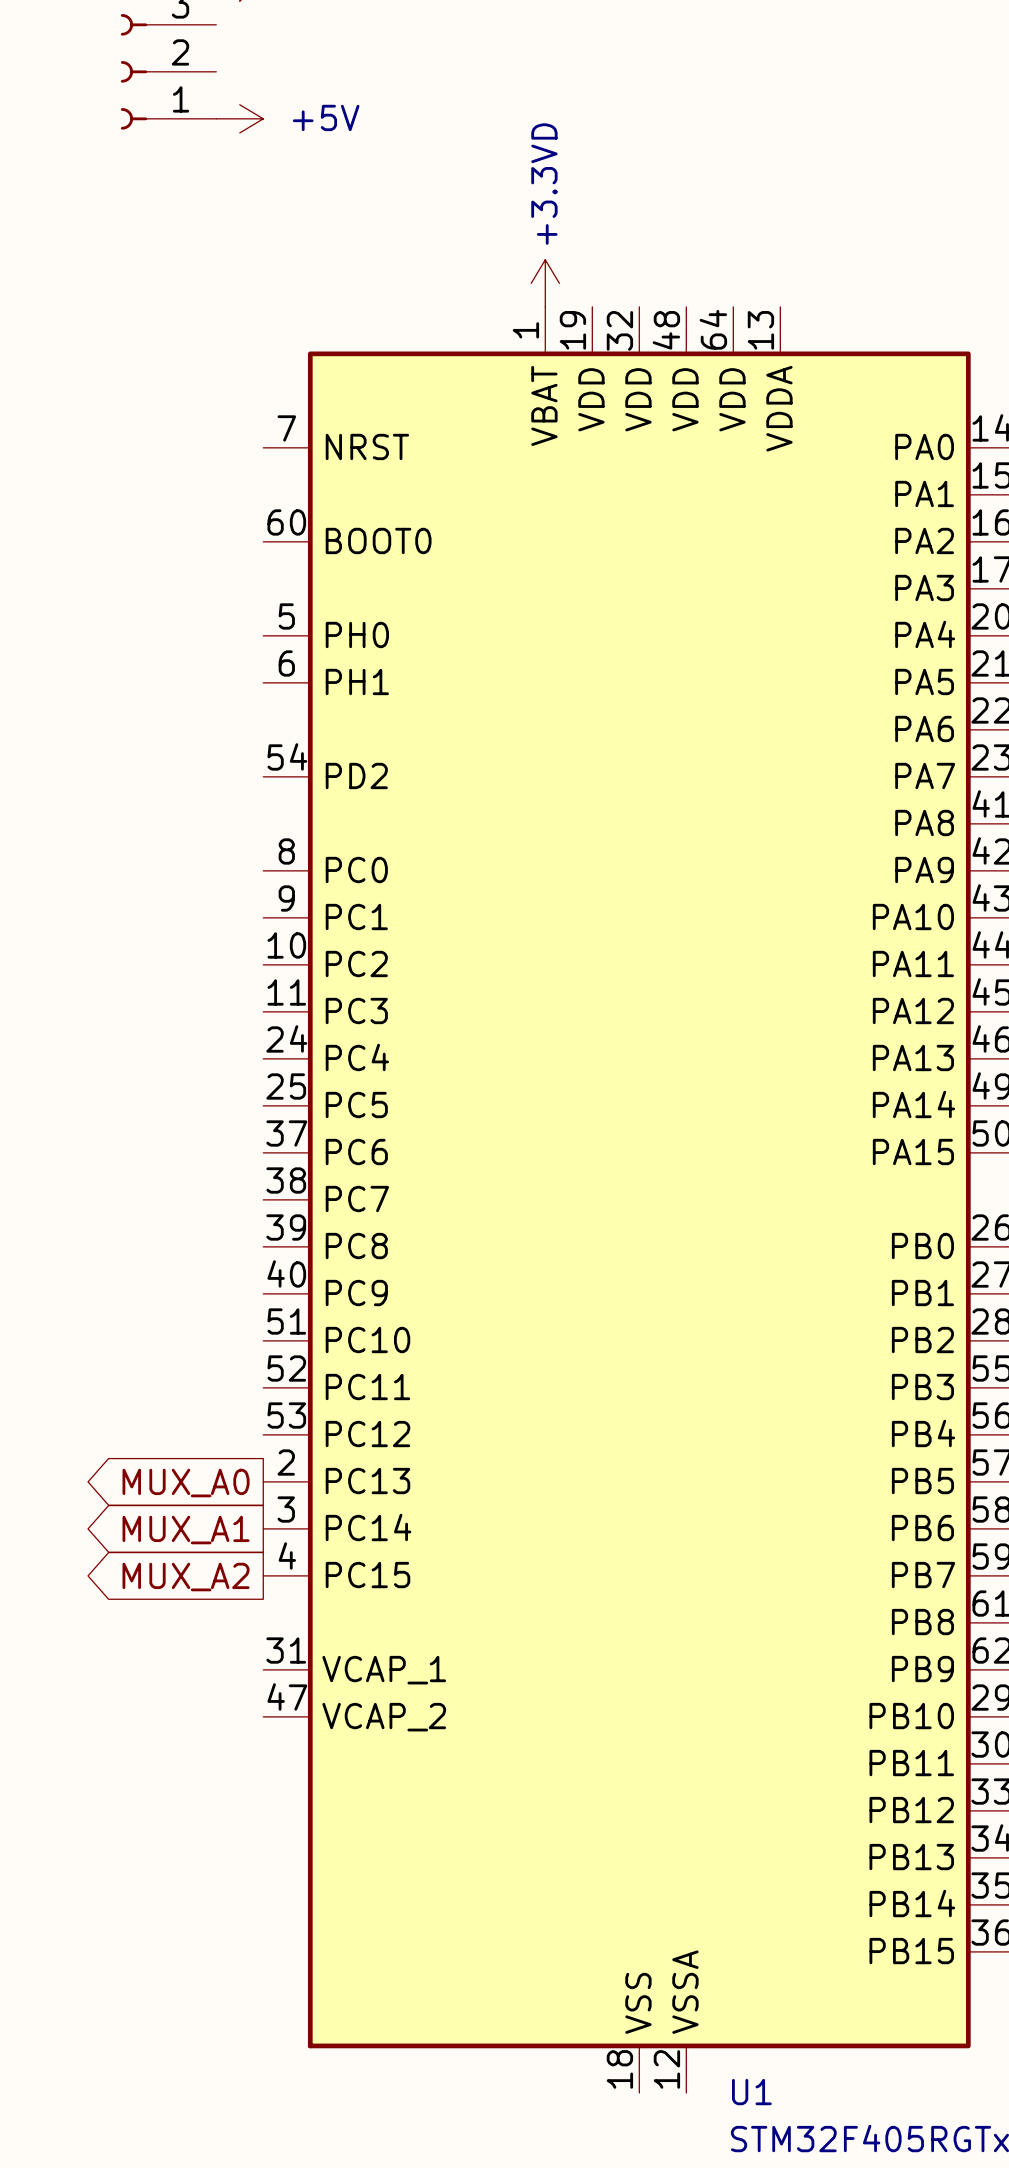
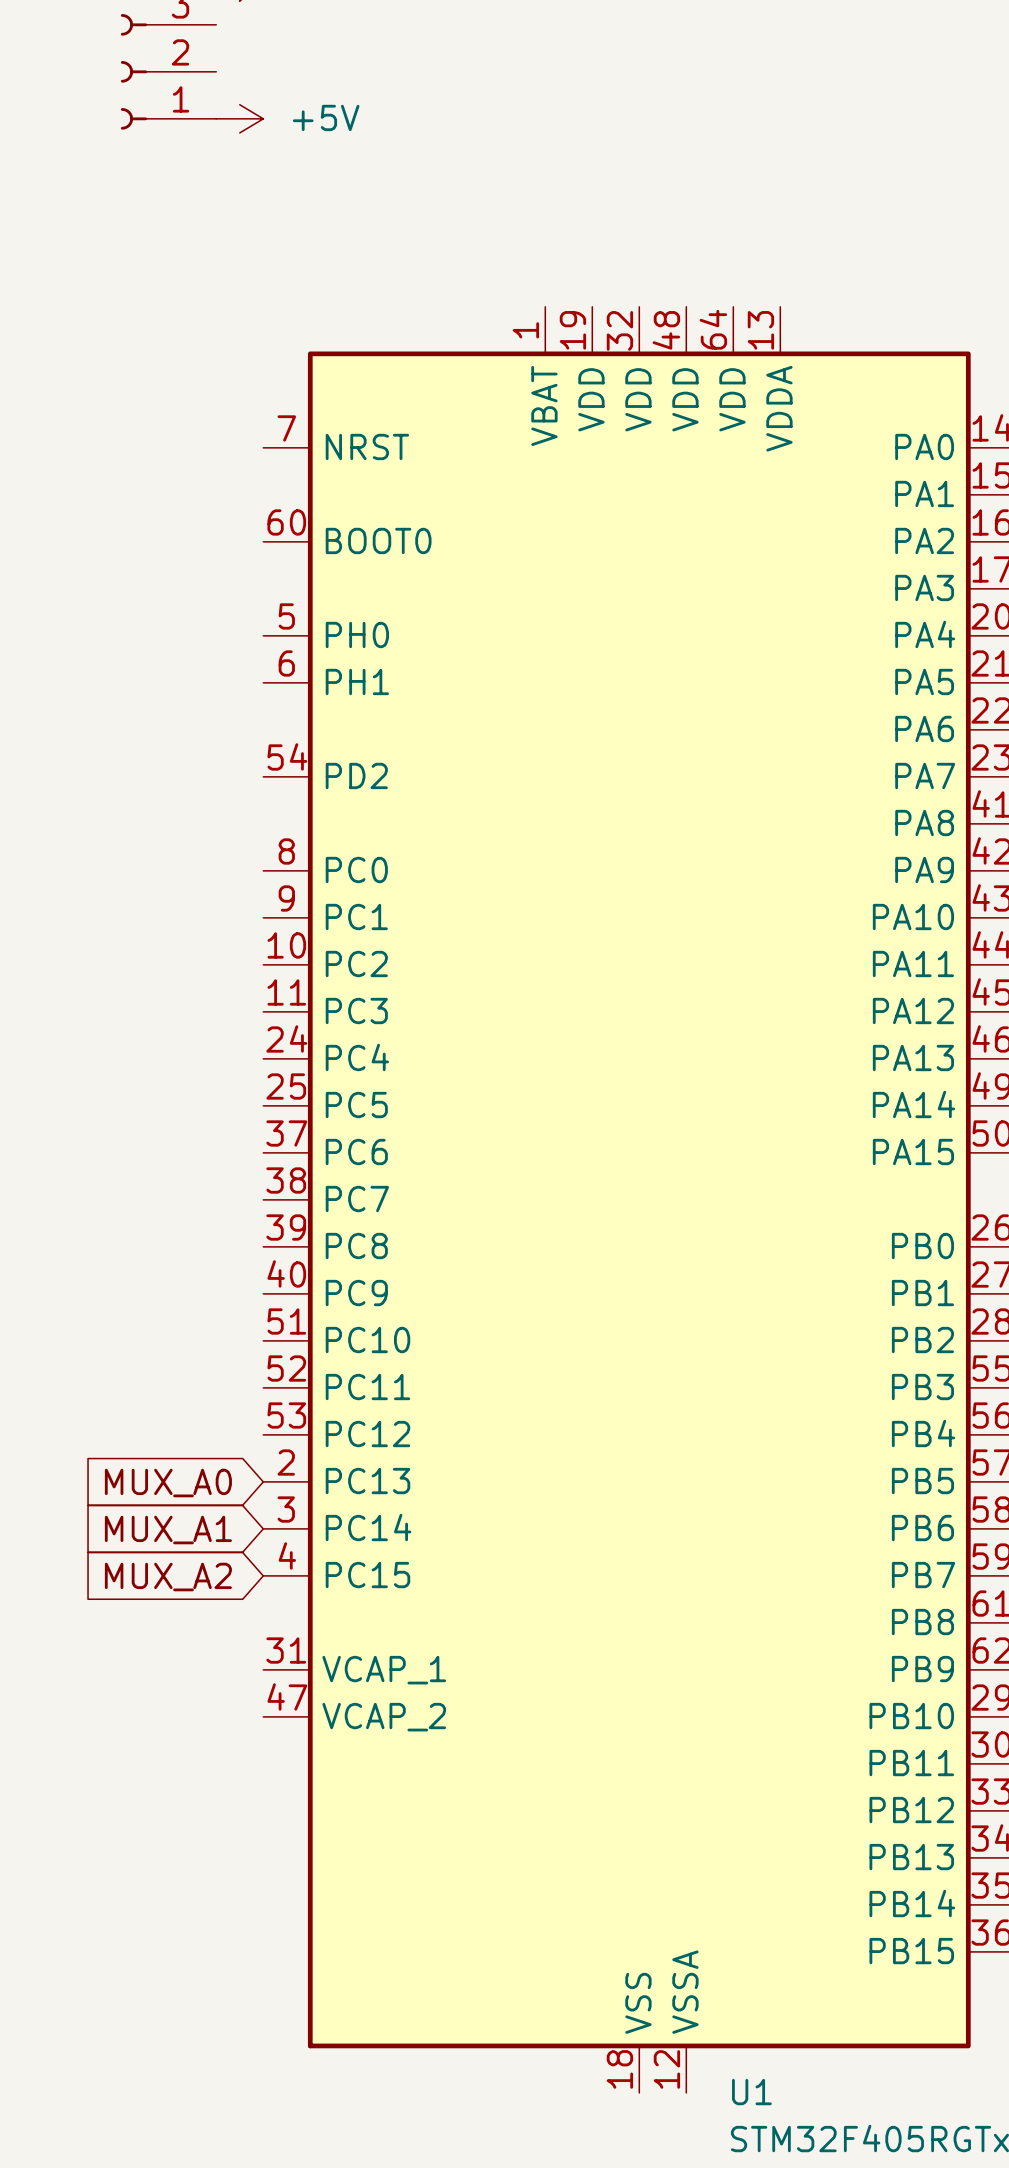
power symbol: +3.3VD (545, 283) -> none
global label shape: output (186, 1483) -> input (168, 1483)
global label shape: output (186, 1530) -> input (168, 1530)
global label shape: output (186, 1577) -> input (168, 1577)

